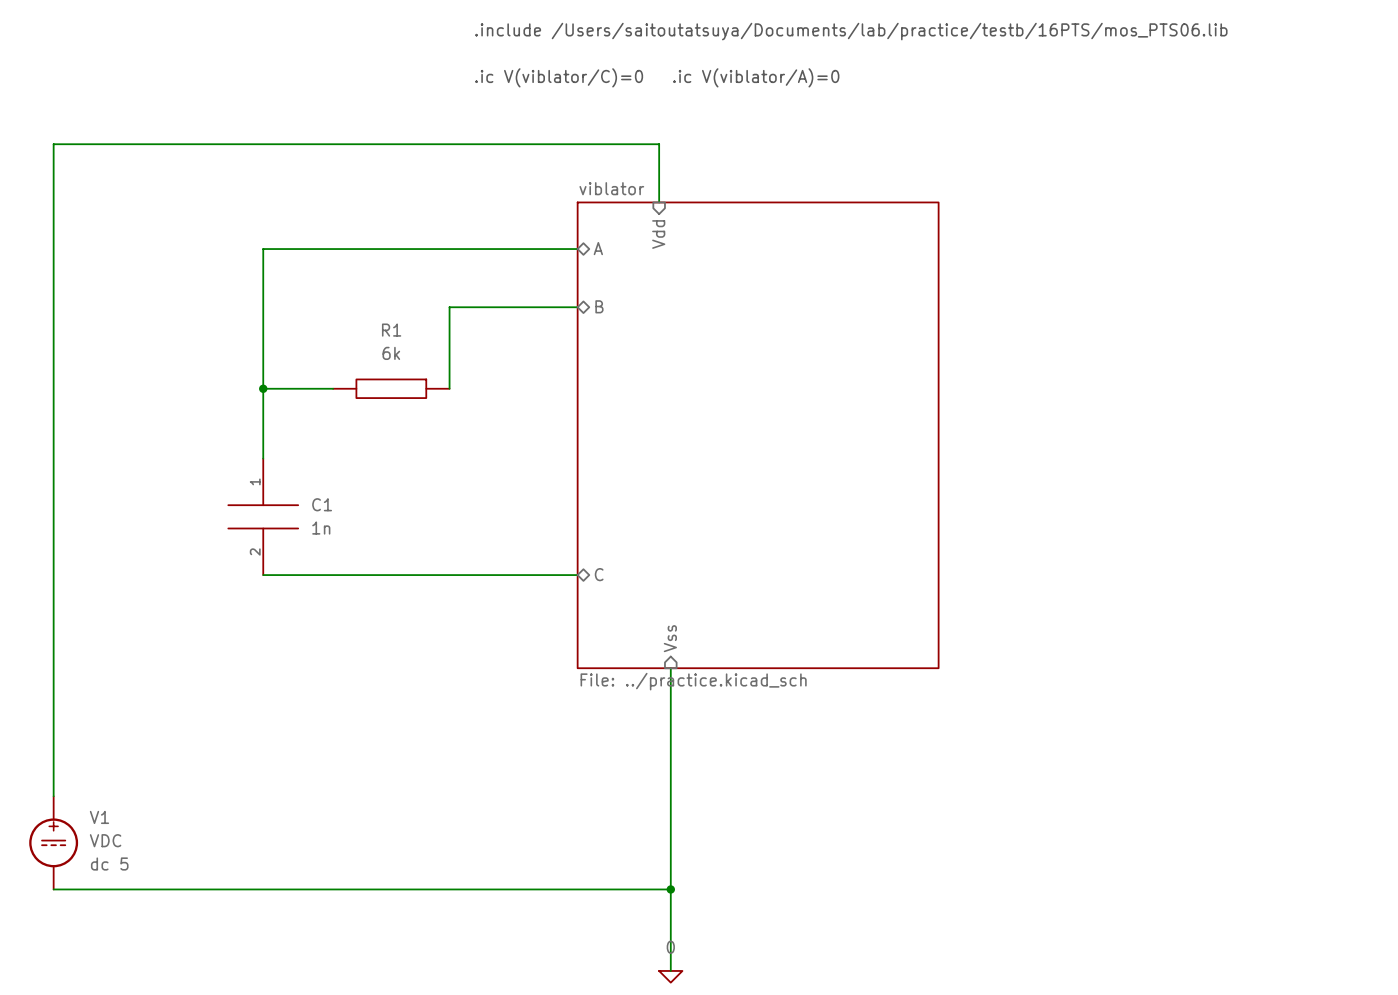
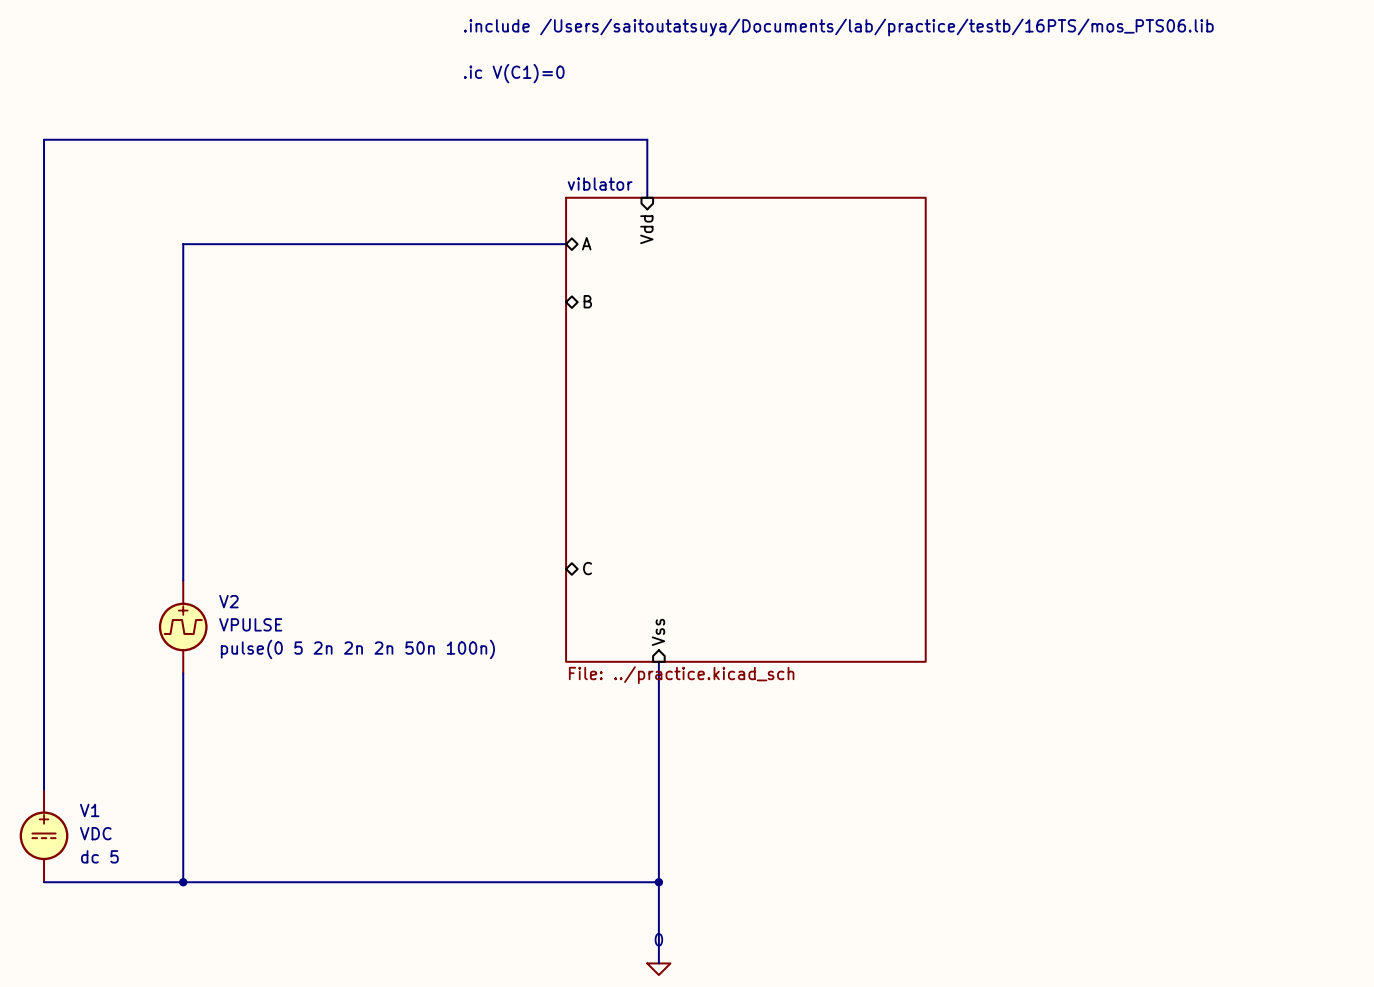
text: .ic V(viblator/C)=0 (559, 77) -> .ic V(C1)=0 (514, 73)
text: .ic V(viblator/A)=0 (756, 77) -> none
wire: (263, 249) (263, 458) -> (252, 244) (183, 244) (183, 580)
wire: (577, 307) (449, 307) (449, 388) -> none
wire: (263, 388) (333, 388) -> none
junction: (263, 388) -> none
R1: 6k (391, 388) -> none
C1: 1n (263, 516) -> none
wire: (263, 575) (577, 575) -> none
V2: none -> VPULSE (183, 627)
wire: none -> (183, 673) (183, 882)
junction: none -> (183, 882)

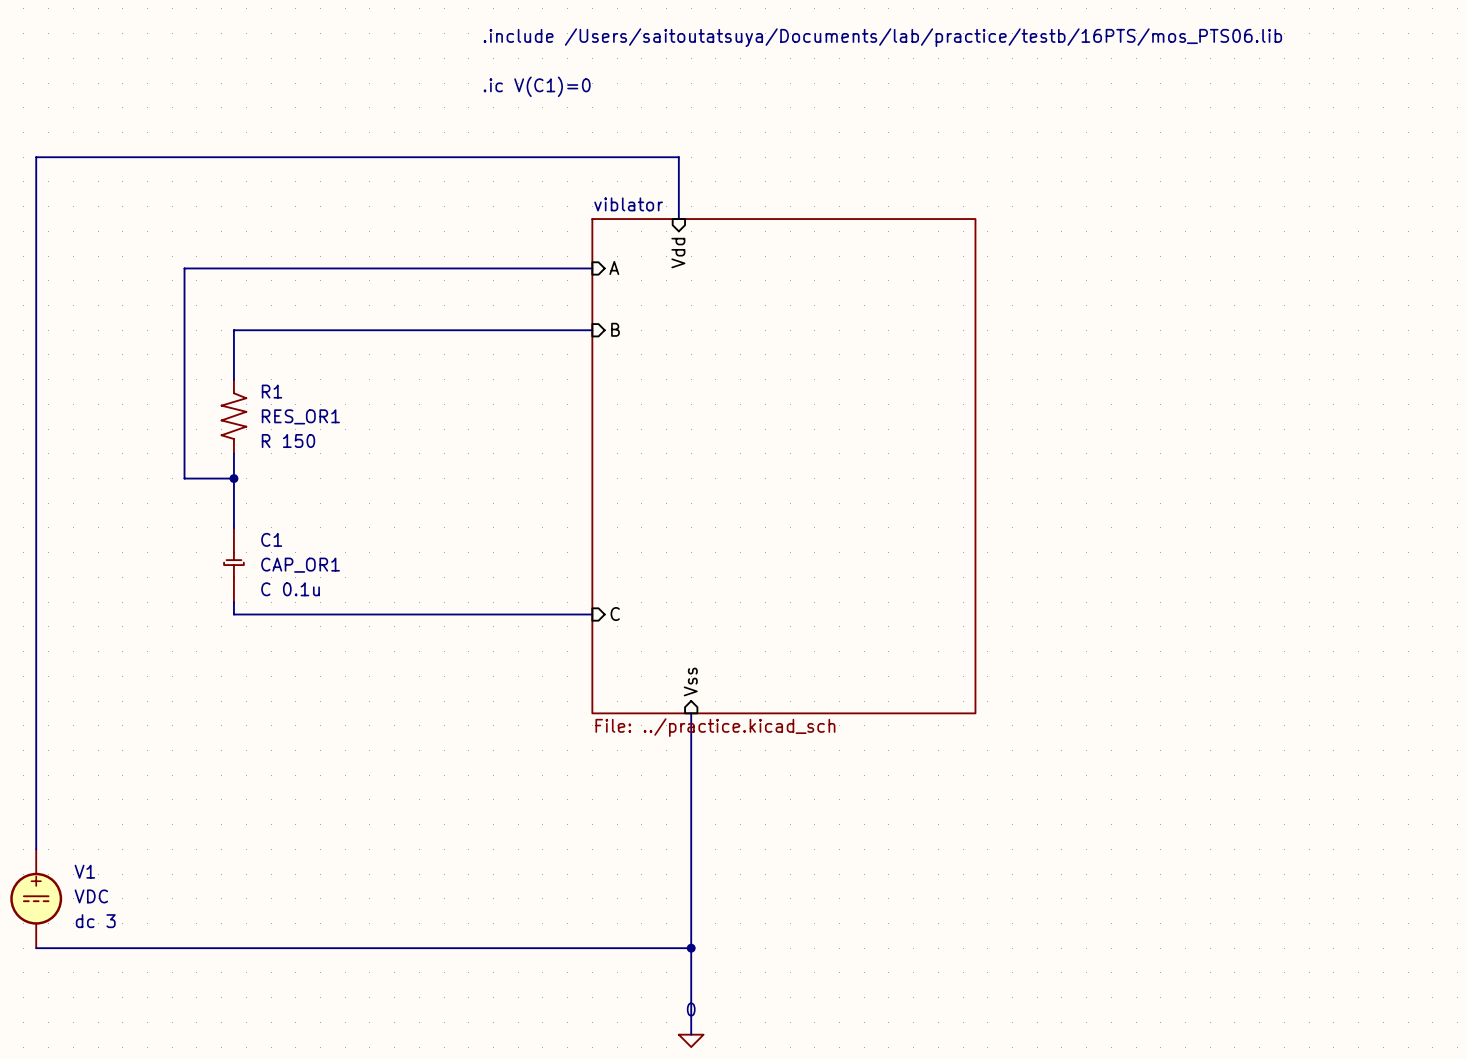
sheet pin shape: bidirectional (586, 243) -> input (614, 268)
sheet pin shape: bidirectional (587, 301) -> input (615, 329)
wire: none -> (592, 330) (233, 330) (233, 379)
R1: none -> RES_OR1 (233, 416)
wire: none -> (233, 453) (233, 527)
wire: (183, 441) (183, 580) -> (184, 478) (233, 478)
junction: none -> (233, 478)
C1: none -> CAP_OR1 (233, 565)
wire: none -> (233, 602) (233, 614) (592, 614)
sheet pin shape: bidirectional (587, 568) -> input (615, 614)
V2: VPULSE (183, 627) -> none
wire: (183, 673) (183, 882) -> none
V1 text: dc 5 (99, 856) -> dc 3 (95, 921)
junction: (183, 882) -> none

